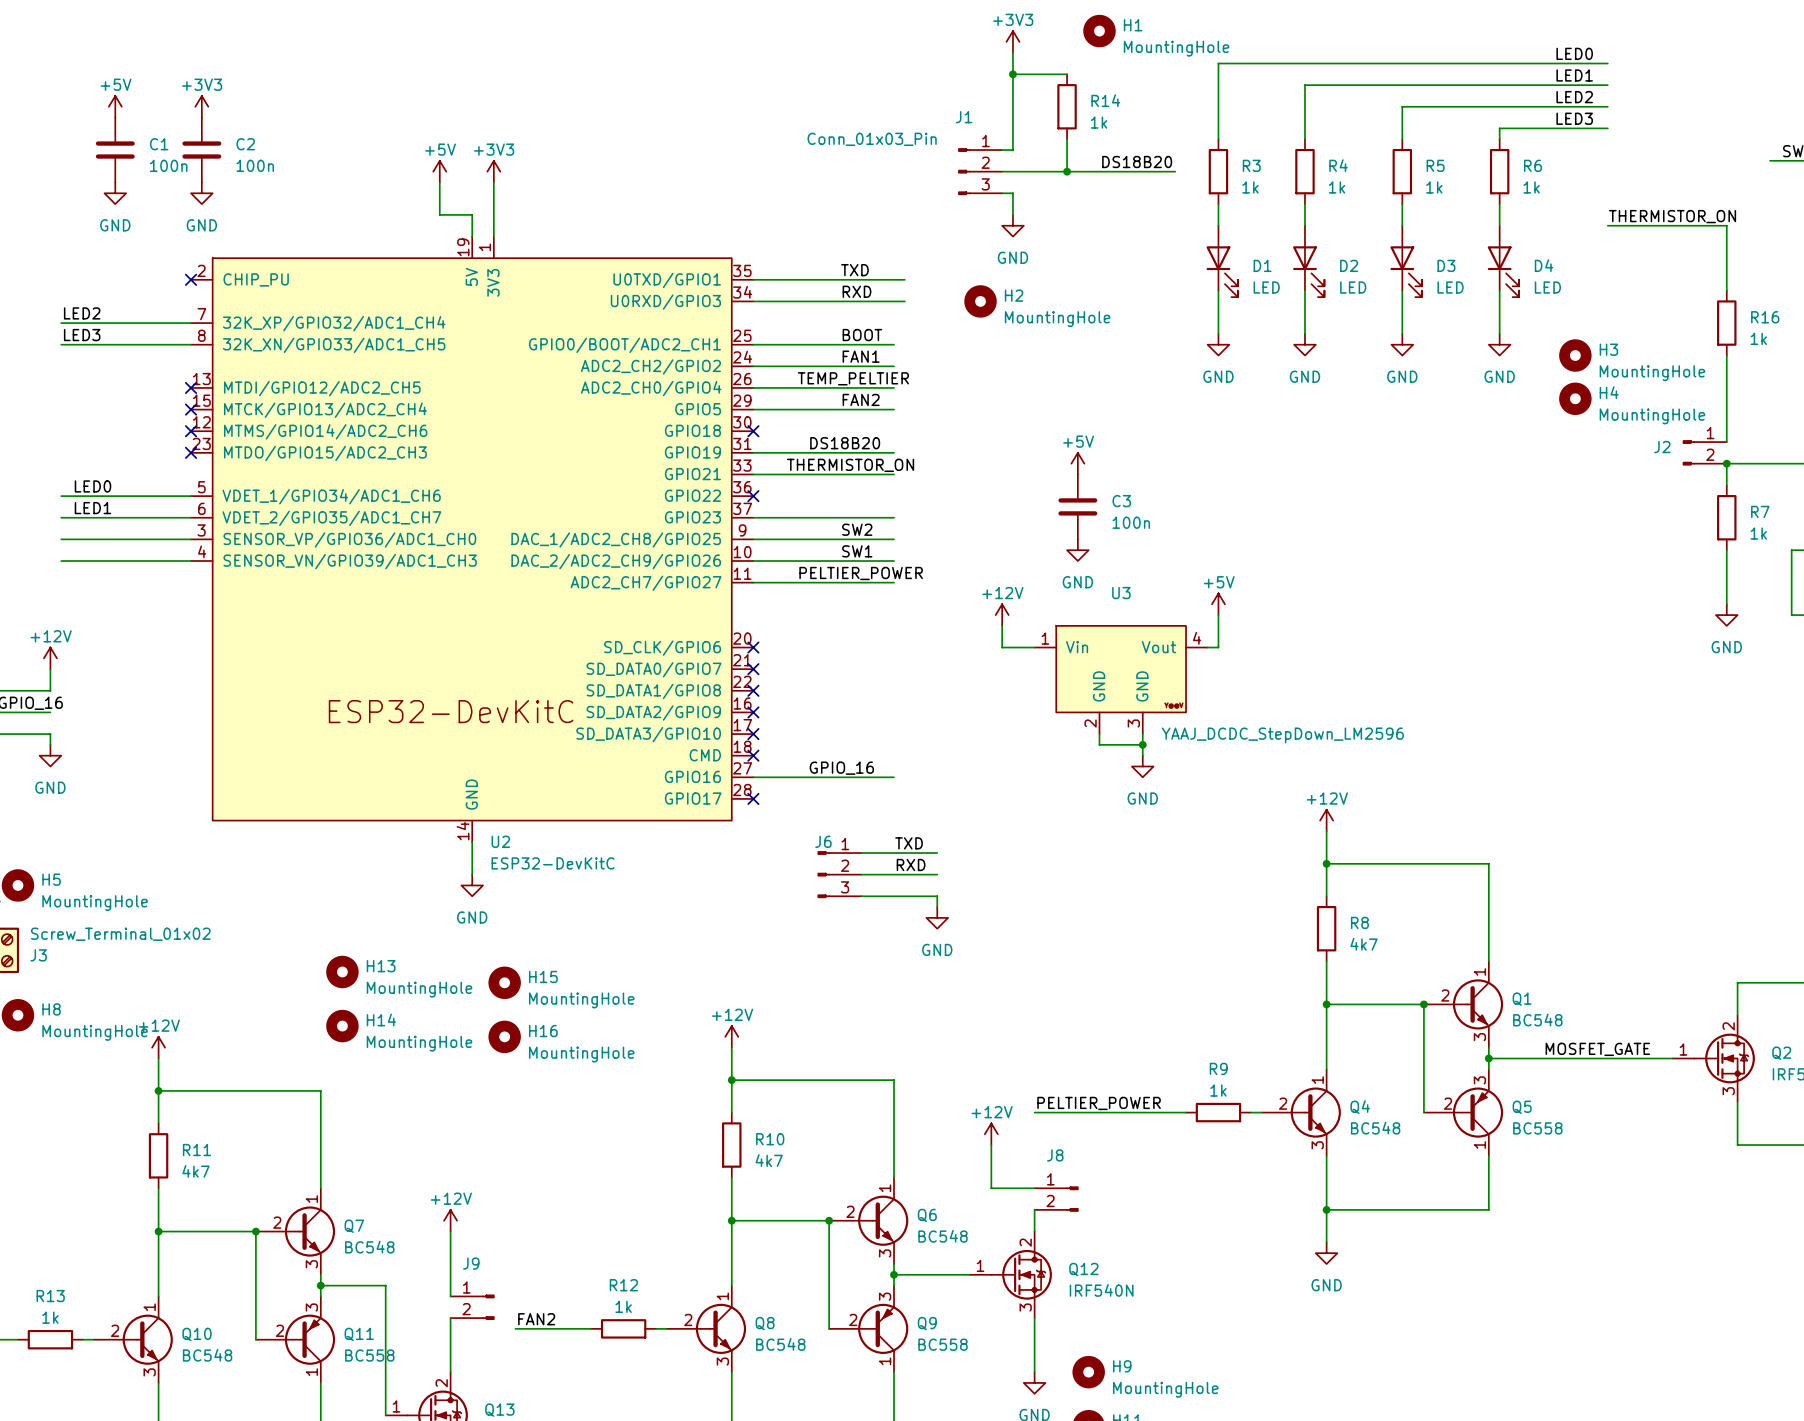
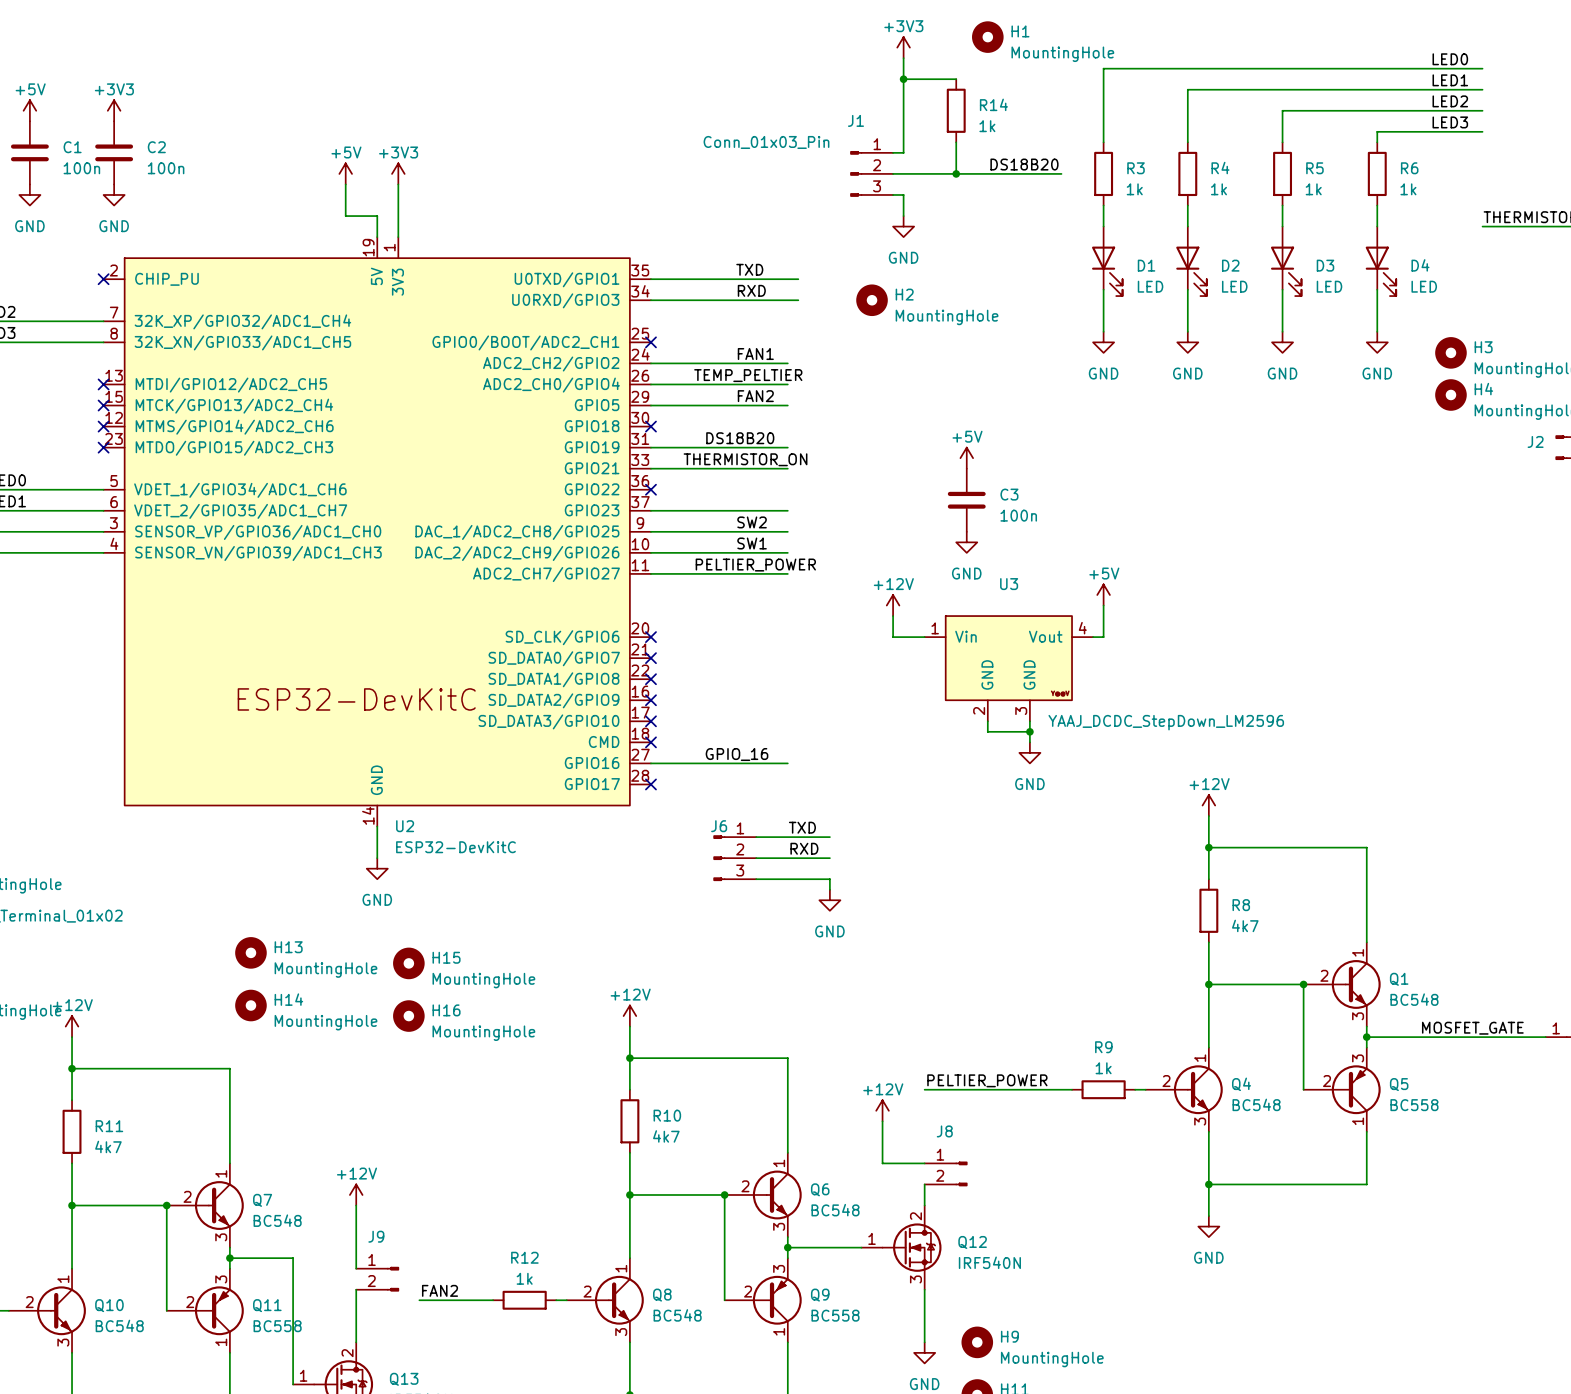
label: BOOT (862, 335) -> none
wire: (753, 344) (894, 344) -> none
no-connect mark: none -> (650, 342)

